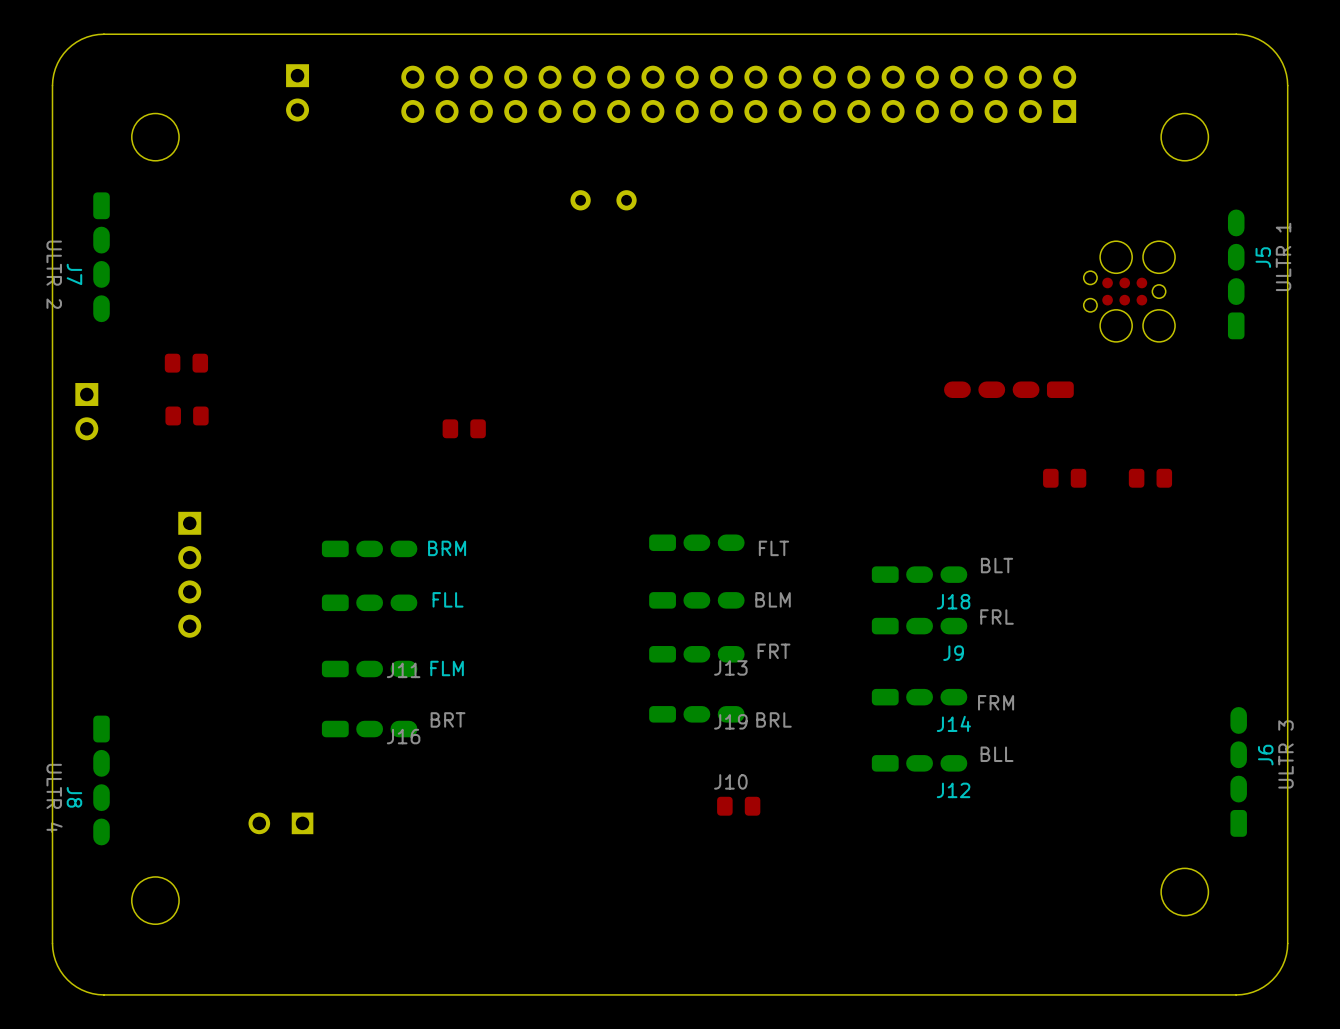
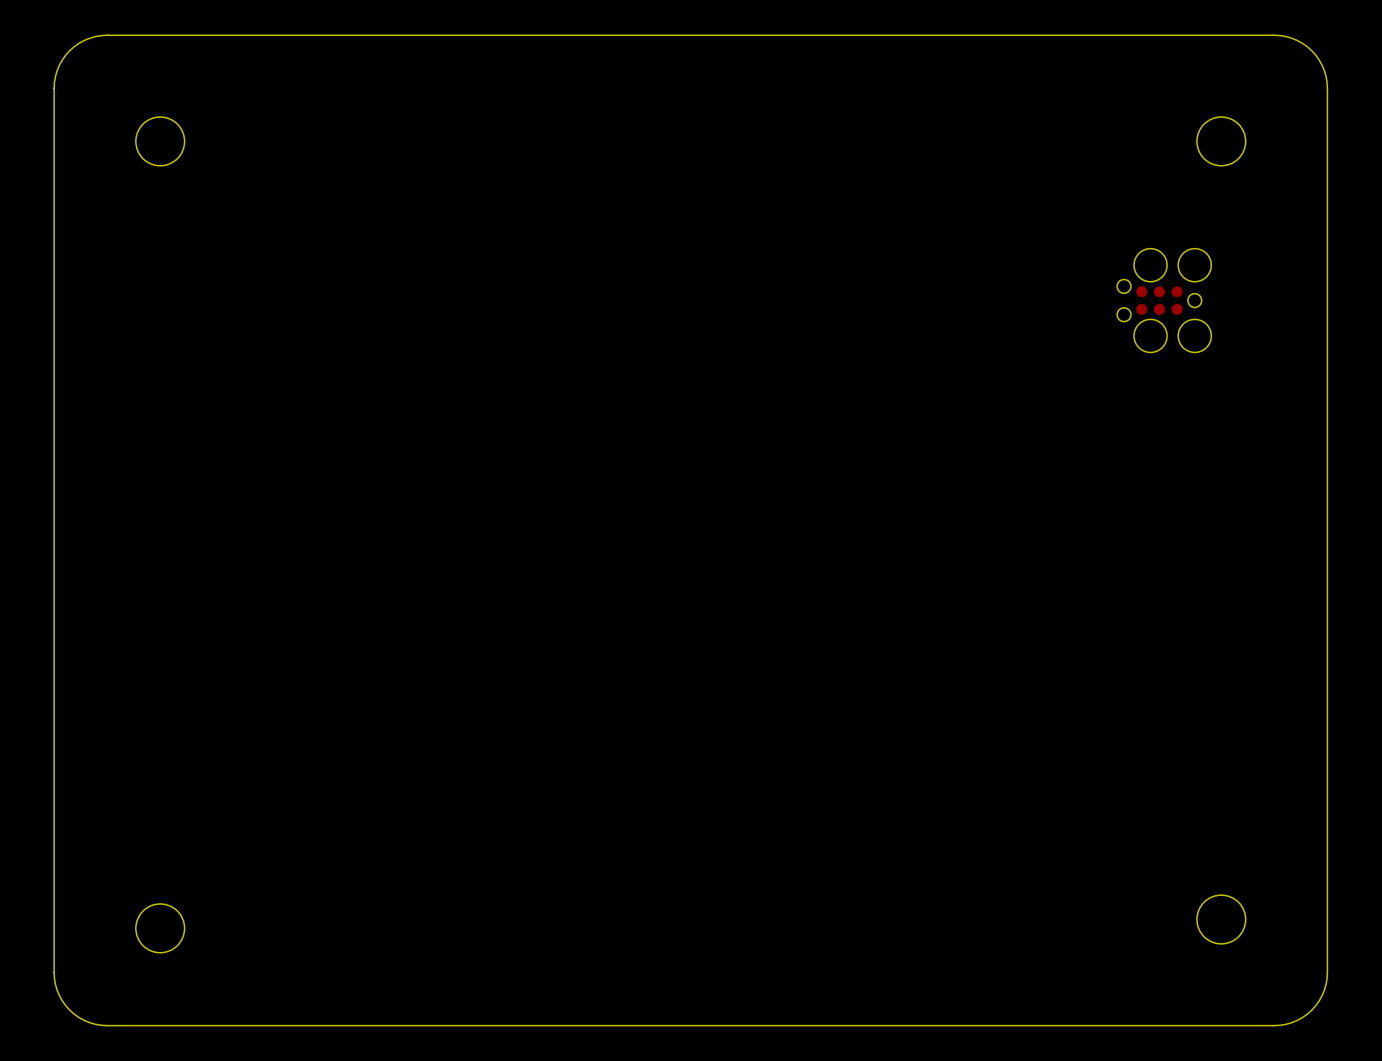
part: (297, 92) -> none
part: (738, 94) -> none
part: (603, 200) -> none
J7: ULTR 2 (101, 257) -> none
J5: ULTR 1 (1236, 274) -> none
part: (186, 363) -> none
part: (1008, 389) -> none
part: (86, 411) -> none
part: (187, 415) -> none
part: (464, 428) -> none
part: (1064, 478) -> none
part: (1150, 478) -> none
part: FLT (696, 542) -> none
part: BRM (369, 548) -> none
part: (189, 574) -> none
J18: BLT (919, 574) -> none
J13: BLM (696, 600) -> none
J11: FLL (369, 602) -> none
J9: FRL (919, 626) -> none
J19: FRT (696, 654) -> none
J16: FLM (369, 668) -> none
J14: FRM (919, 697) -> none
J10: BRL (696, 714) -> none
part: BRT (369, 729) -> none
J12: BLL (919, 763) -> none
J6: ULTR 3 (1238, 771) -> none
J8: ULTR 4 (101, 780) -> none
part: (738, 806) -> none
part: (280, 823) -> none

